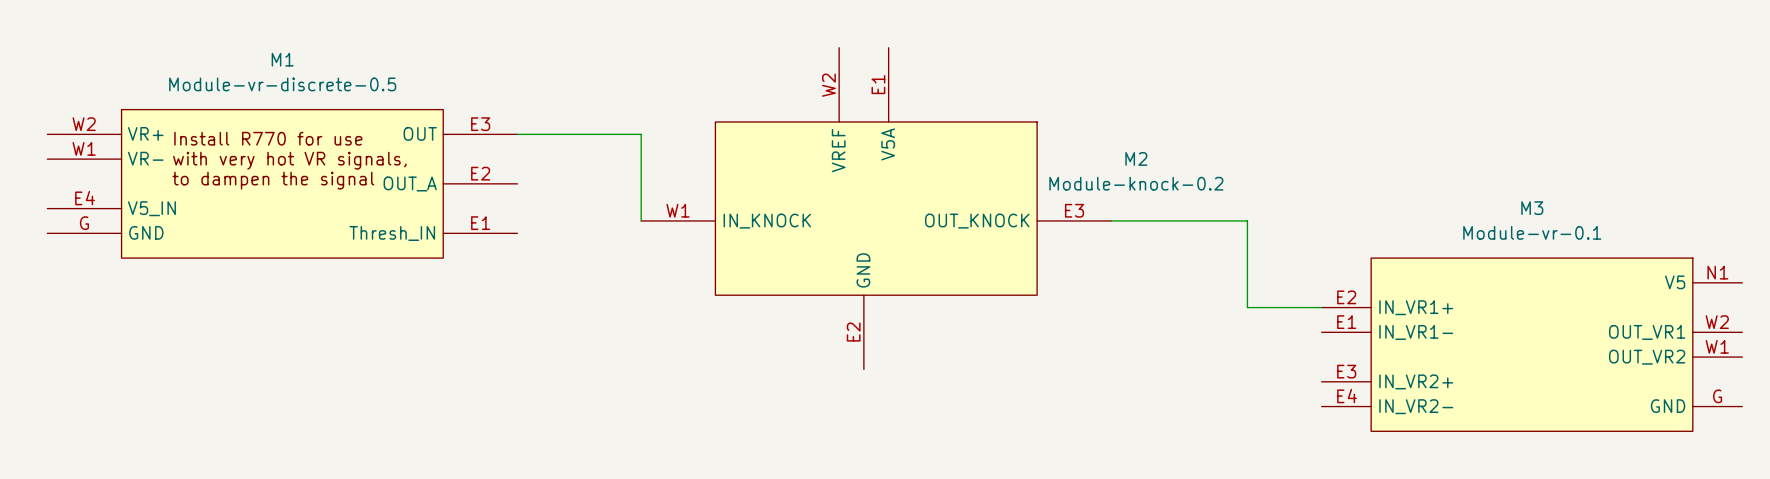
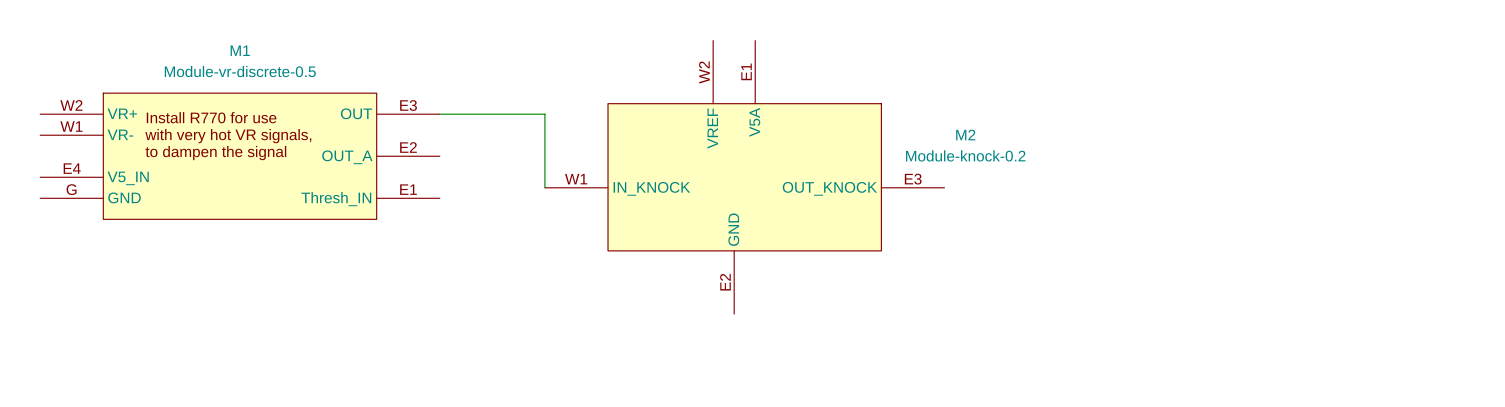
wire: (1111, 220) (1247, 220) (1247, 307) (1321, 307) -> none
M3: Module-vr-0.1 (1531, 344) -> none

